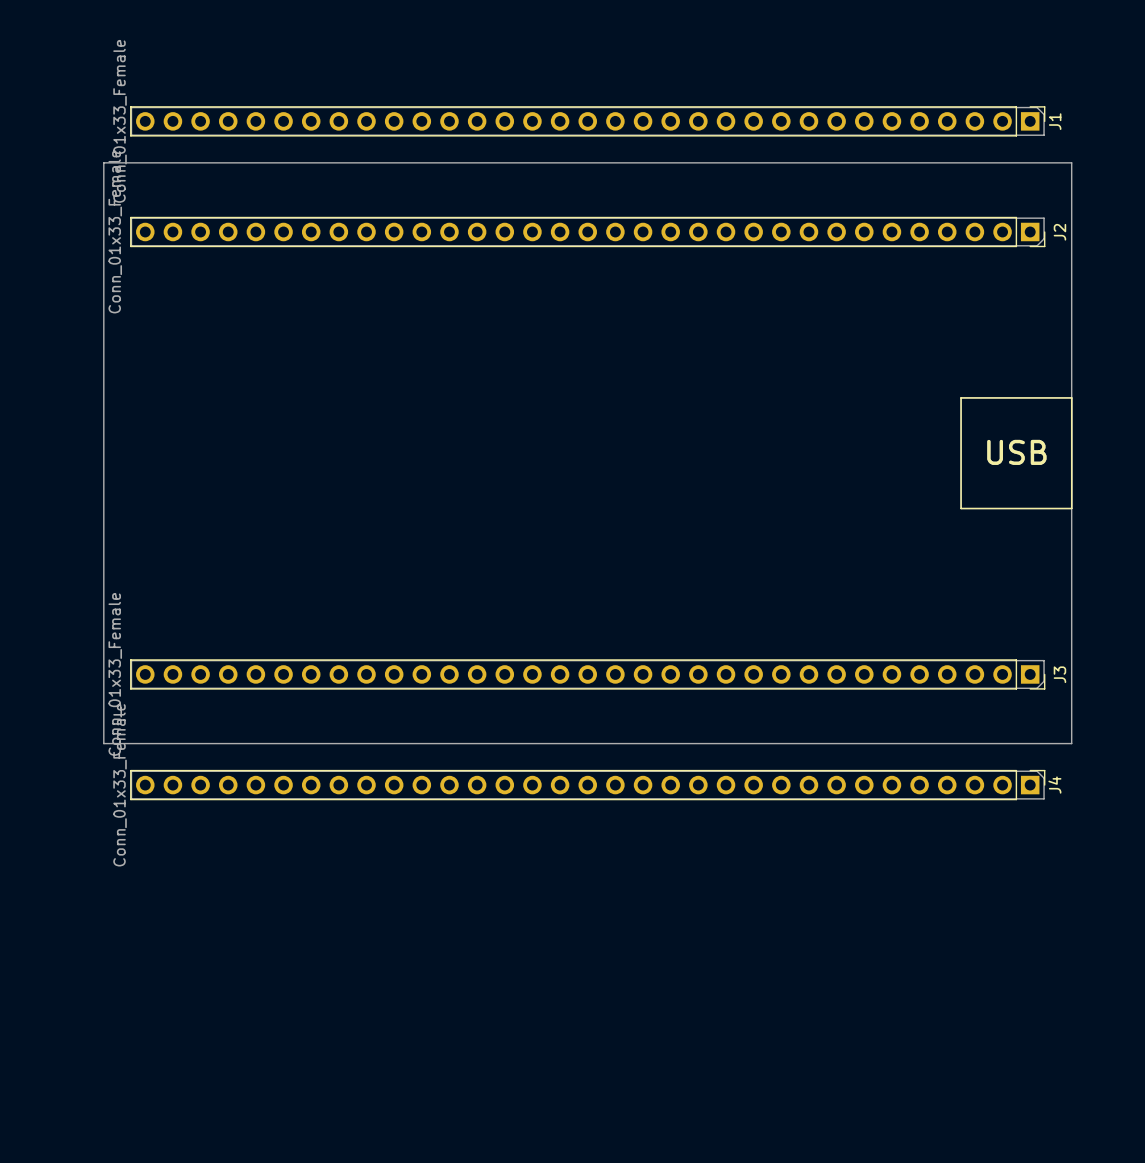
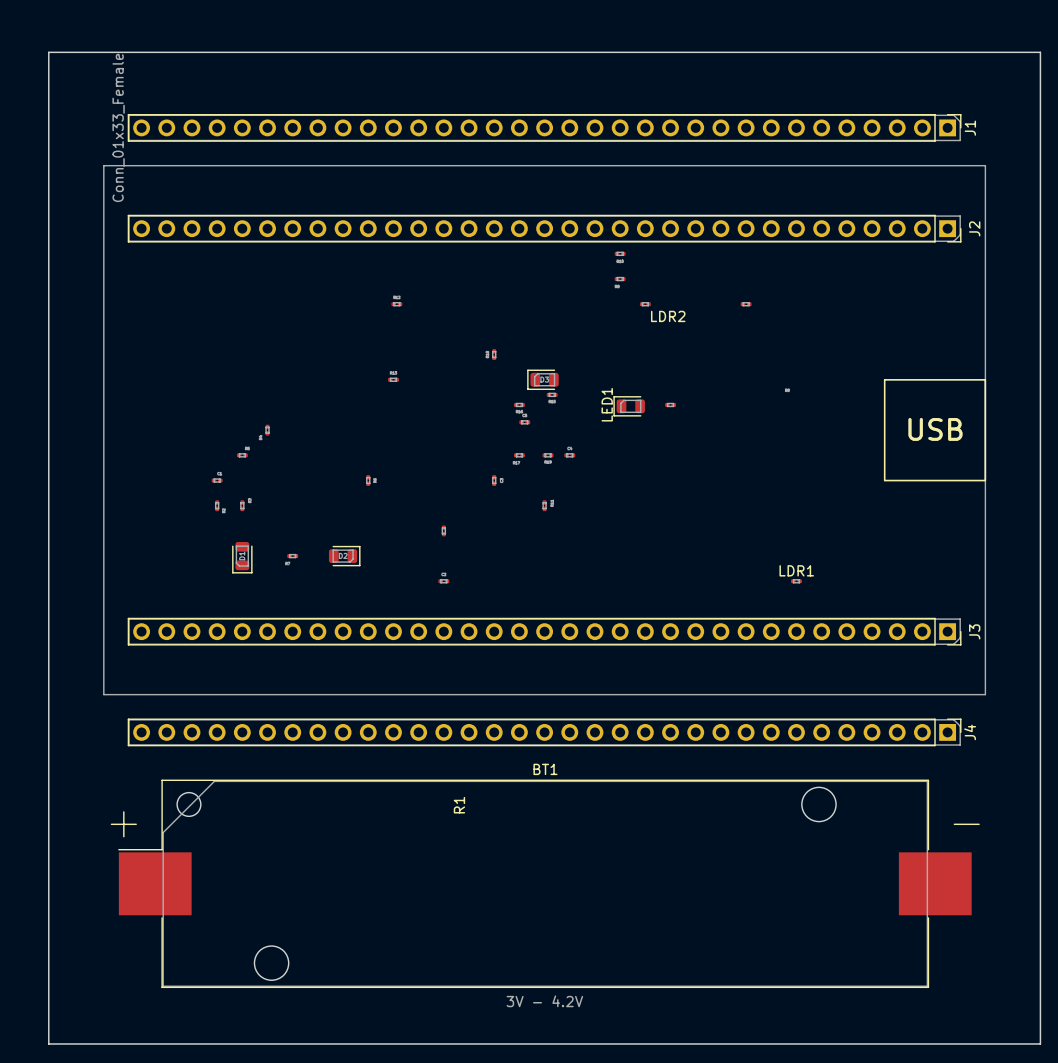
board edge: none -> (48, 52) (1040, 52) (1040, 1043) (48, 1043) (48, 52)
J2 value: Conn_01x33_Female (115, 231) -> none
part: none -> (620, 253)
part: none -> (620, 279)
part: none -> (396, 304)
LDR2: none -> (645, 304)
part: none -> (746, 304)
part: none -> (494, 354)
part: none -> (393, 379)
part: none -> (543, 379)
part: none -> (552, 394)
part: none -> (519, 404)
part: none -> (670, 404)
LED1: none -> (629, 406)
part: none -> (524, 422)
part: none -> (267, 430)
part: none -> (242, 455)
part: none -> (519, 455)
part: none -> (548, 455)
part: none -> (569, 455)
part: none -> (217, 480)
part: none -> (368, 480)
part: none -> (494, 480)
part: none -> (217, 505)
part: none -> (242, 505)
part: none -> (544, 505)
R1: none -> (443, 530)
part: none -> (292, 556)
part: none -> (344, 556)
part: none -> (242, 557)
part: none -> (443, 581)
LDR1: none -> (796, 581)
J3 value: Conn_01x33_Female (115, 674) -> none
J4 value: Conn_01x33_Female (120, 785) -> none
BT1: none -> 3V - 4.2V (545, 883)

